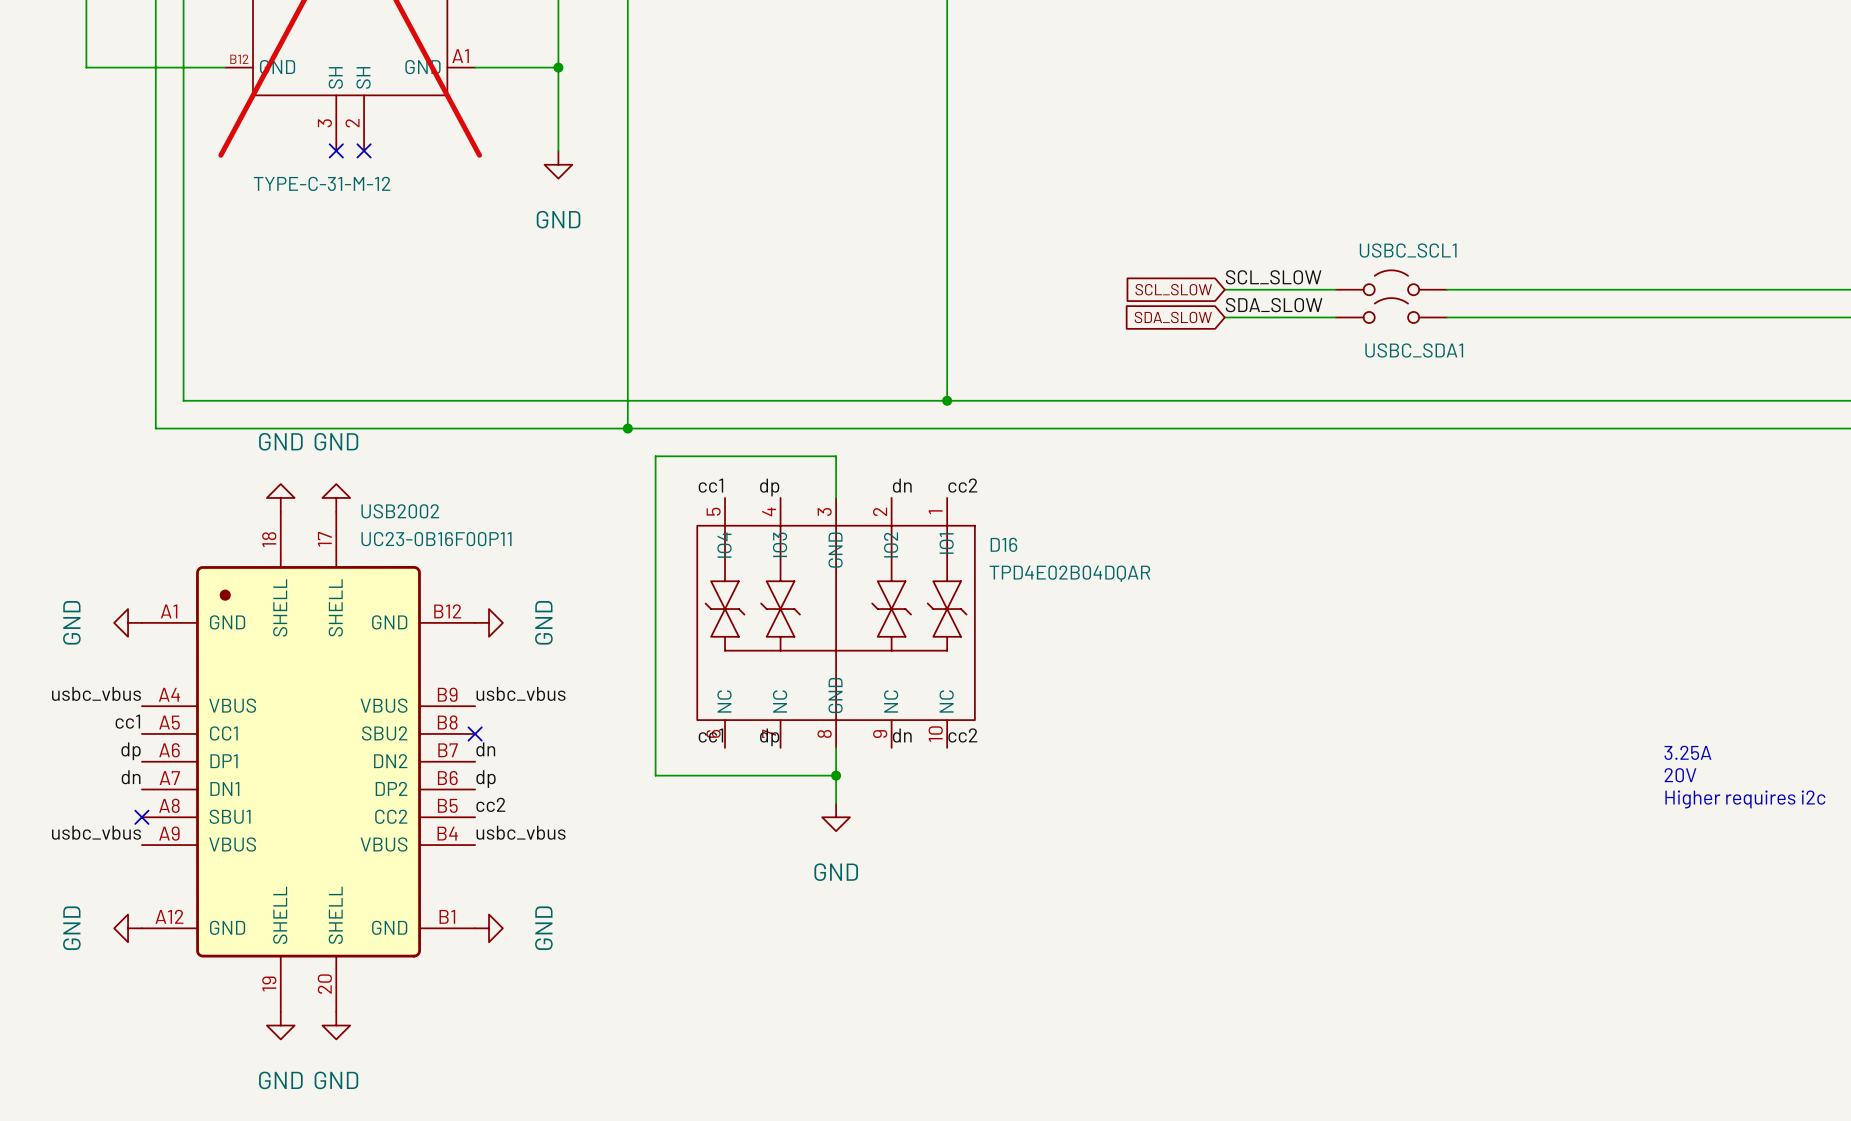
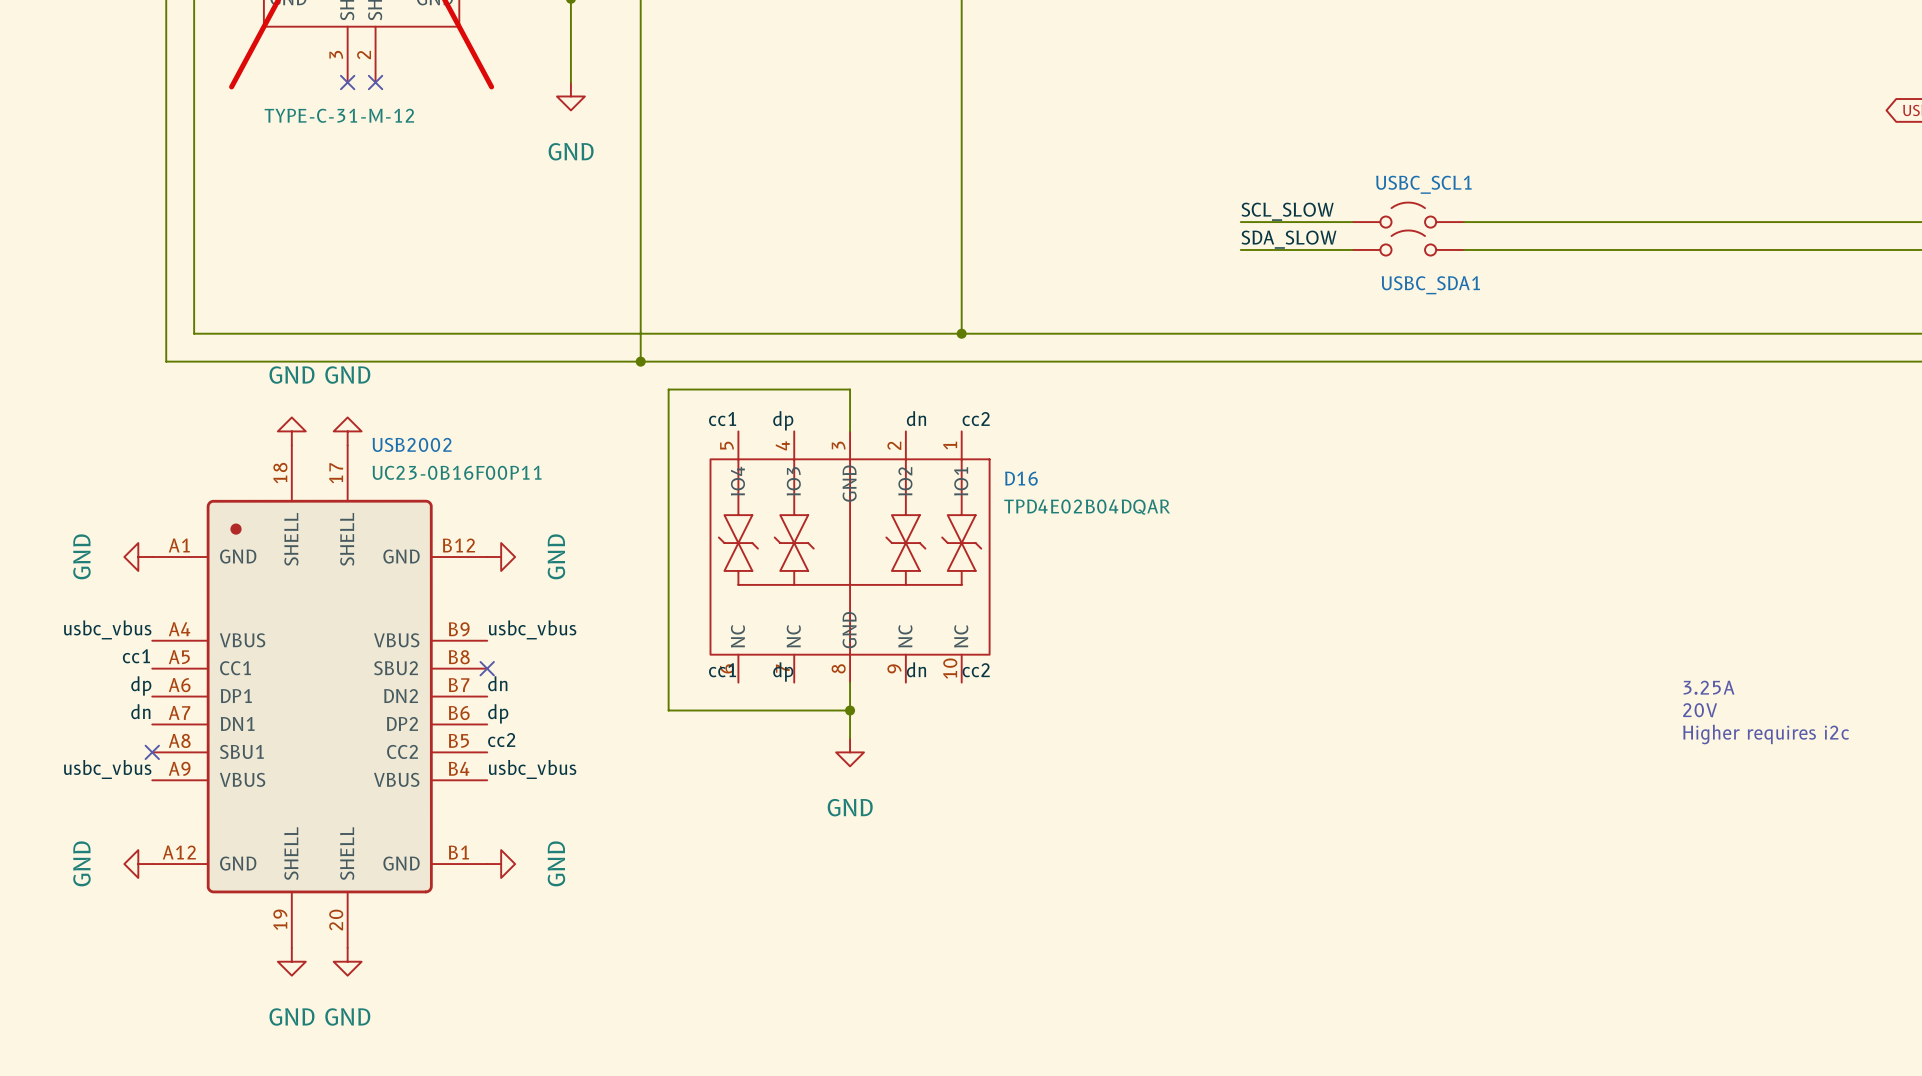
global label: SCL_SLOW (1173, 289) -> none
global label: SDA_SLOW (1173, 317) -> none

